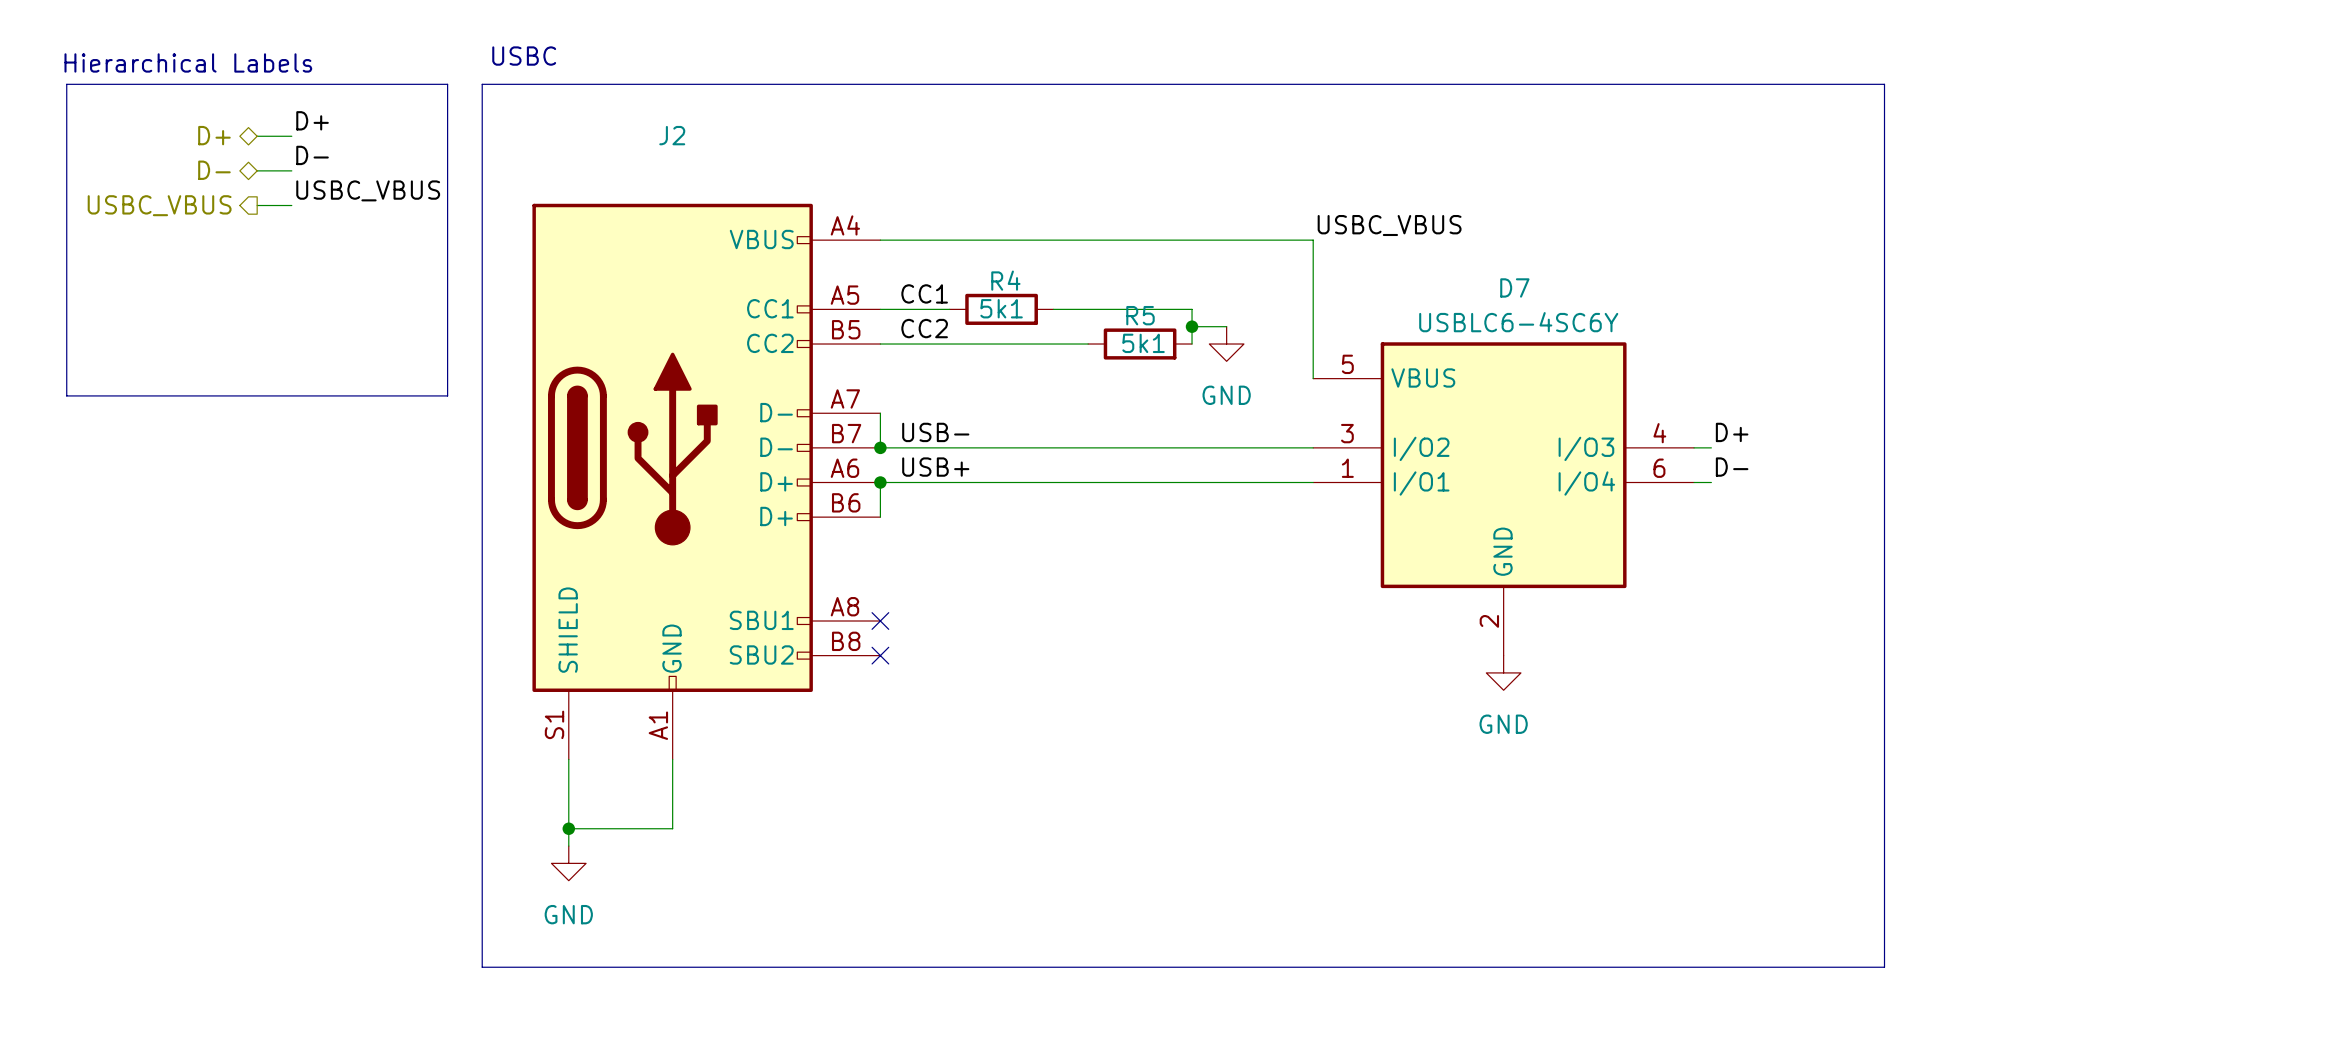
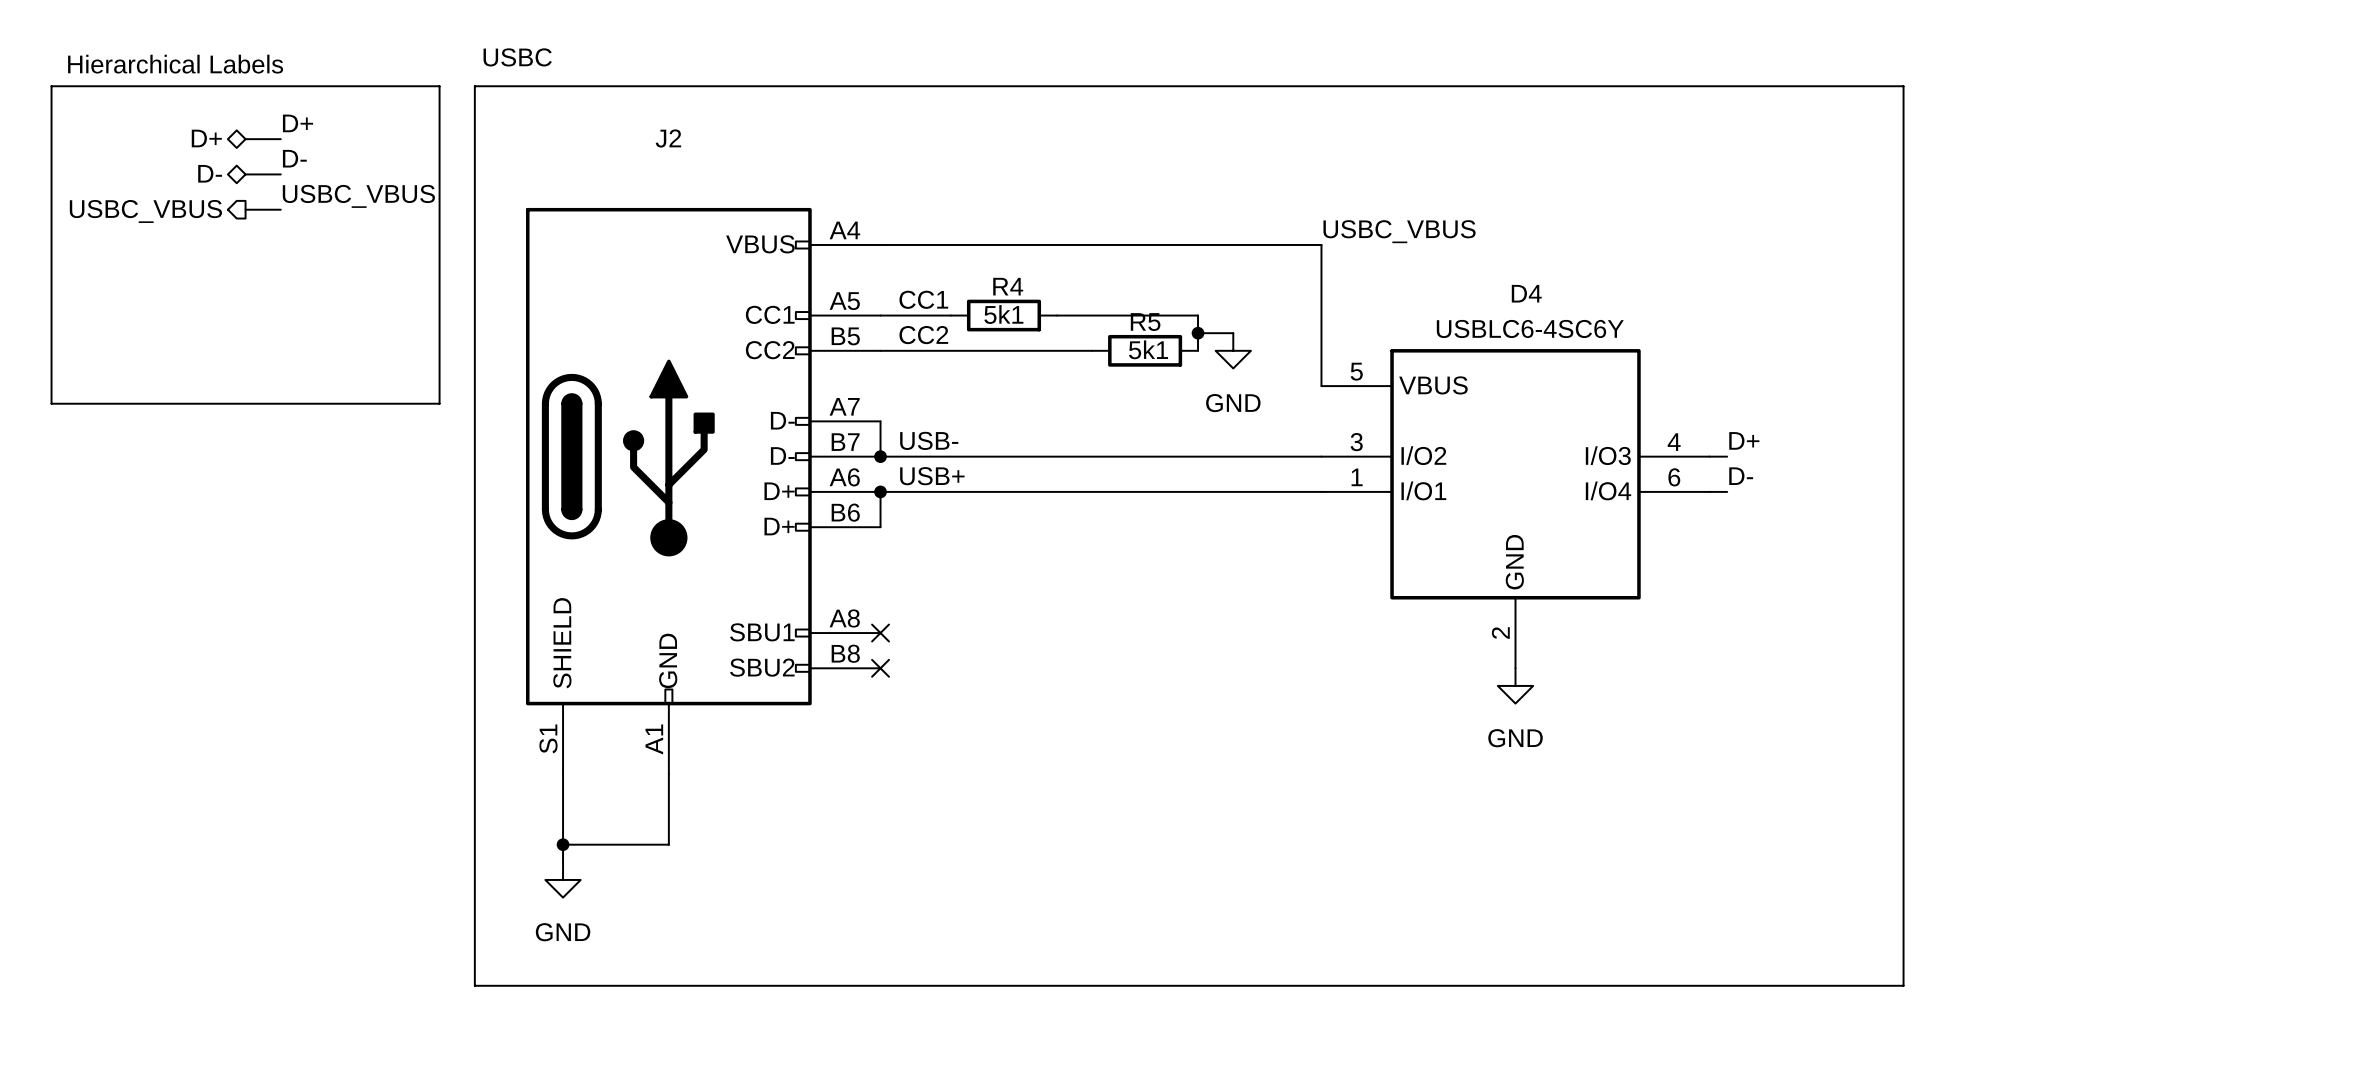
D7 name: D7 (1514, 287) -> D4 (1526, 293)

